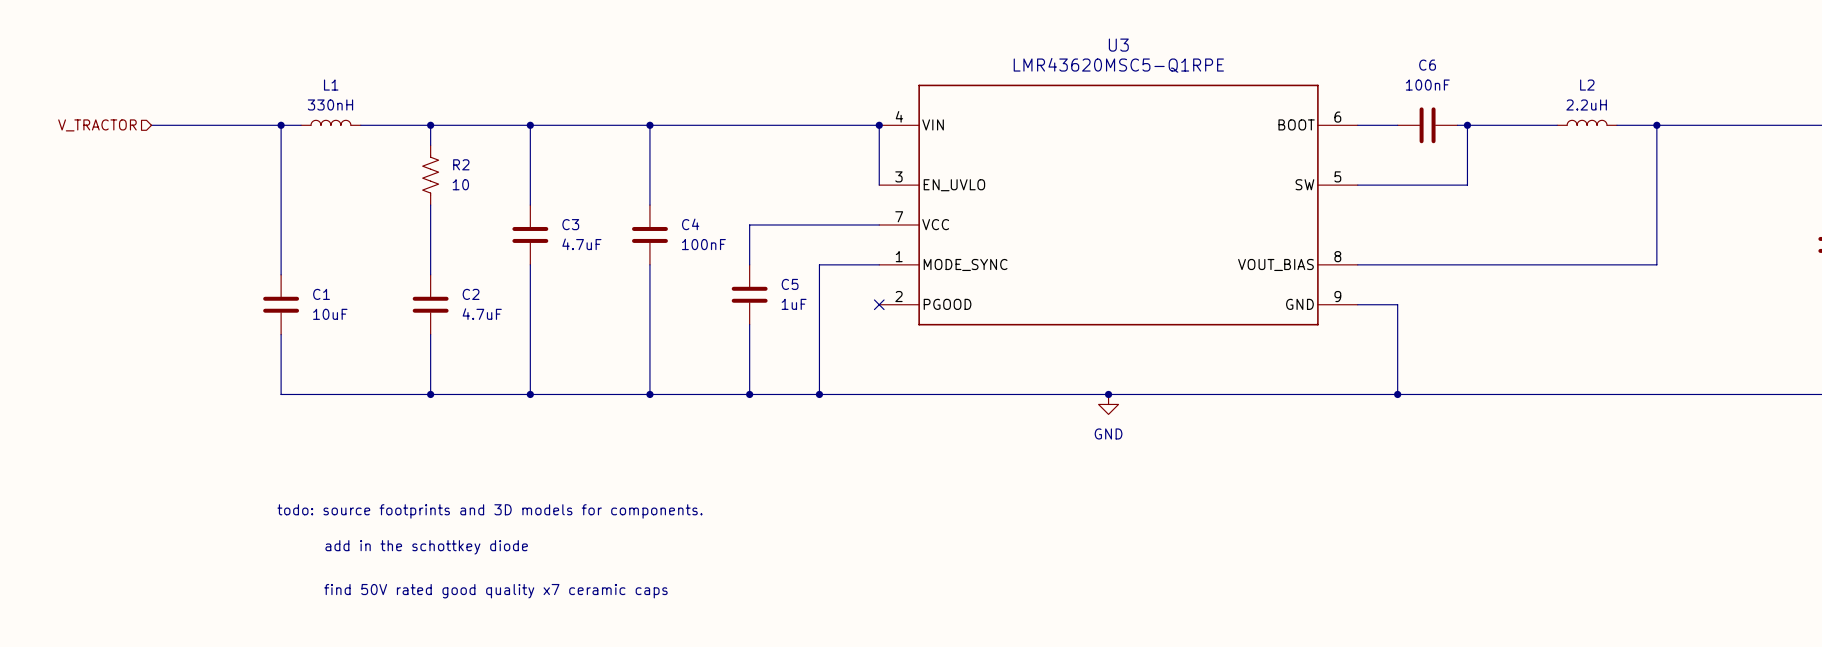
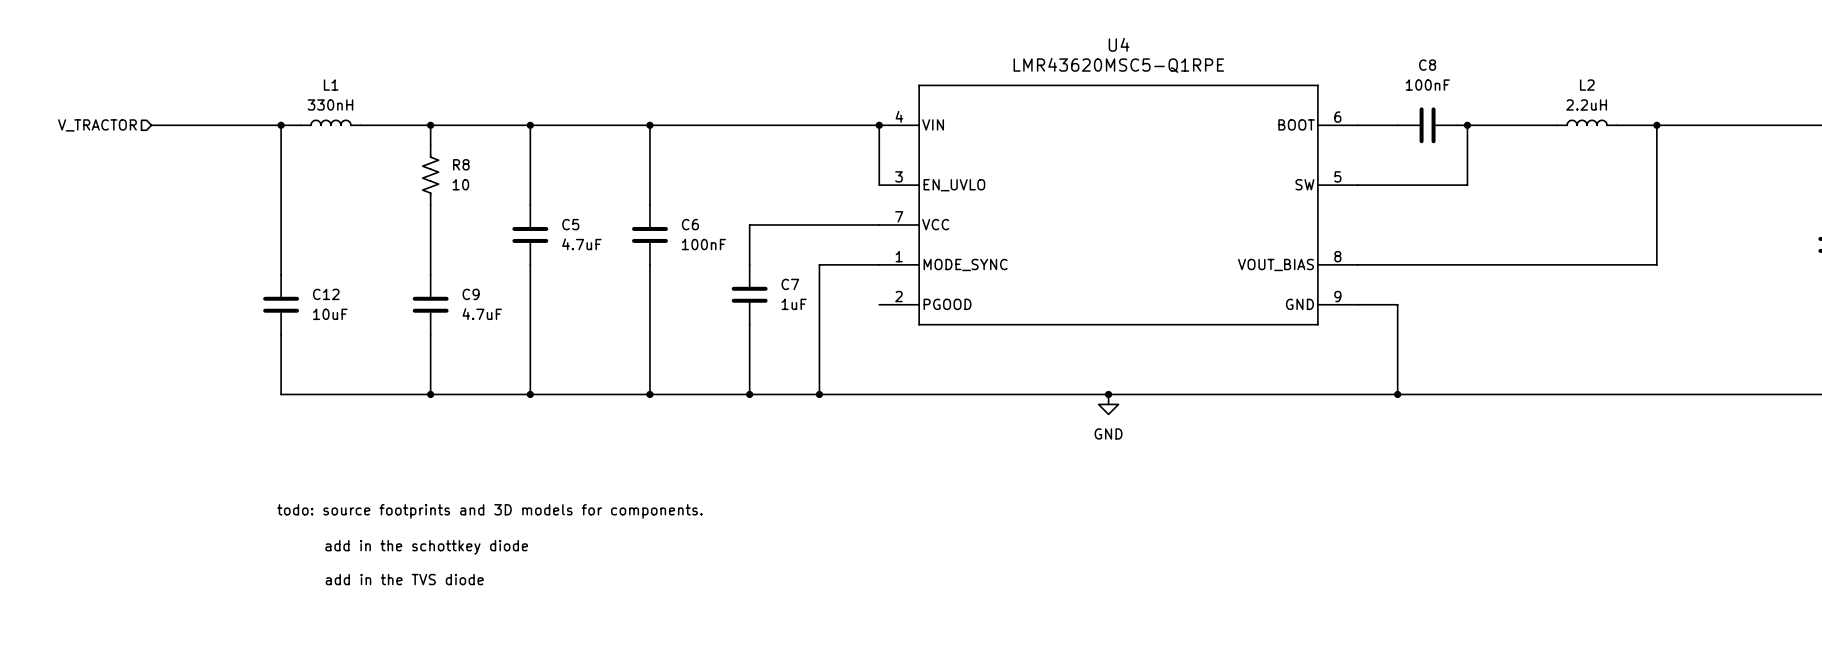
U3 name: U3 (1118, 45) -> U4 (1119, 44)
C6 name: C6 (1427, 65) -> C8 (1427, 65)
R2 name: R2 (461, 164) -> R8 (461, 164)
C3 name: C3 (570, 224) -> C5 (570, 224)
C4 name: C4 (690, 224) -> C6 (690, 224)
C5 name: C5 (790, 284) -> C7 (790, 284)
C1 name: C1 (321, 294) -> C12 (326, 294)
C2 name: C2 (471, 294) -> C9 (471, 294)
no-connect mark: (879, 304) -> none
text: none -> add in the TVS diode (404, 579)
text: find 50V rated good quality x7 ceramic caps (495, 591) -> none

